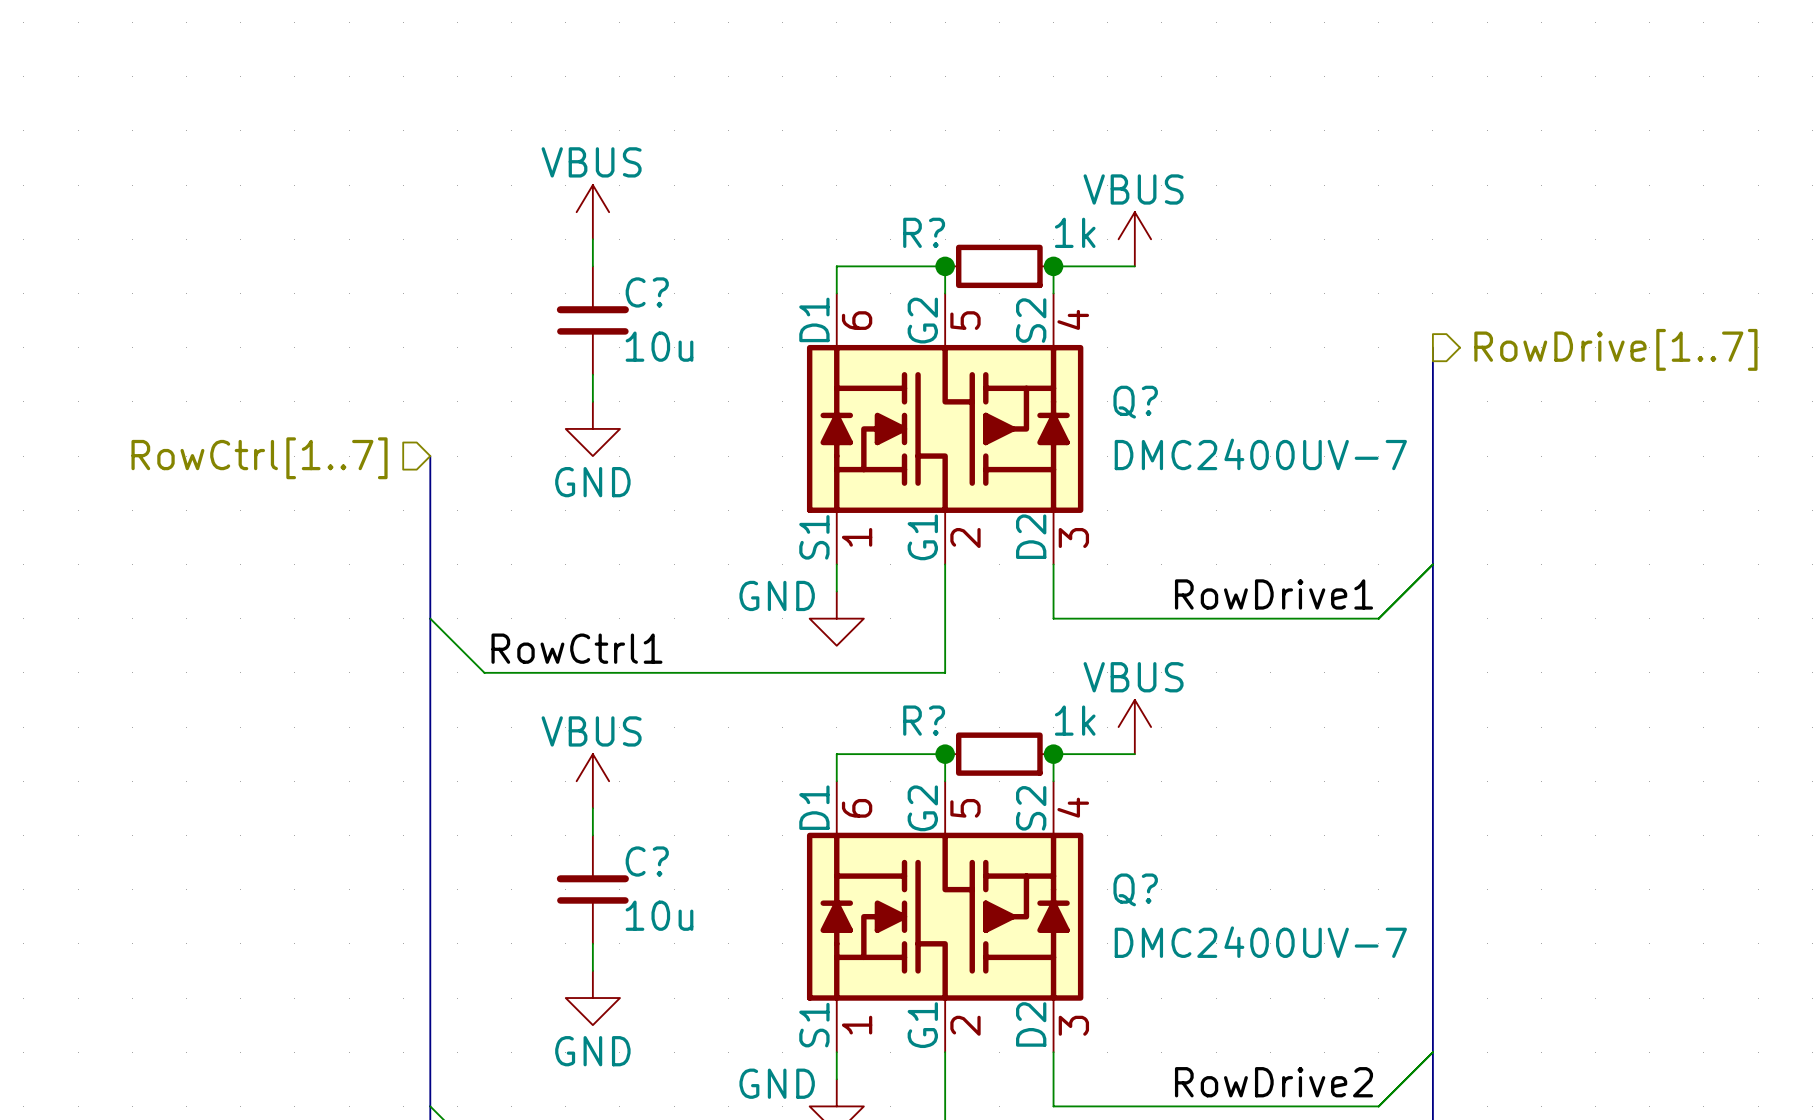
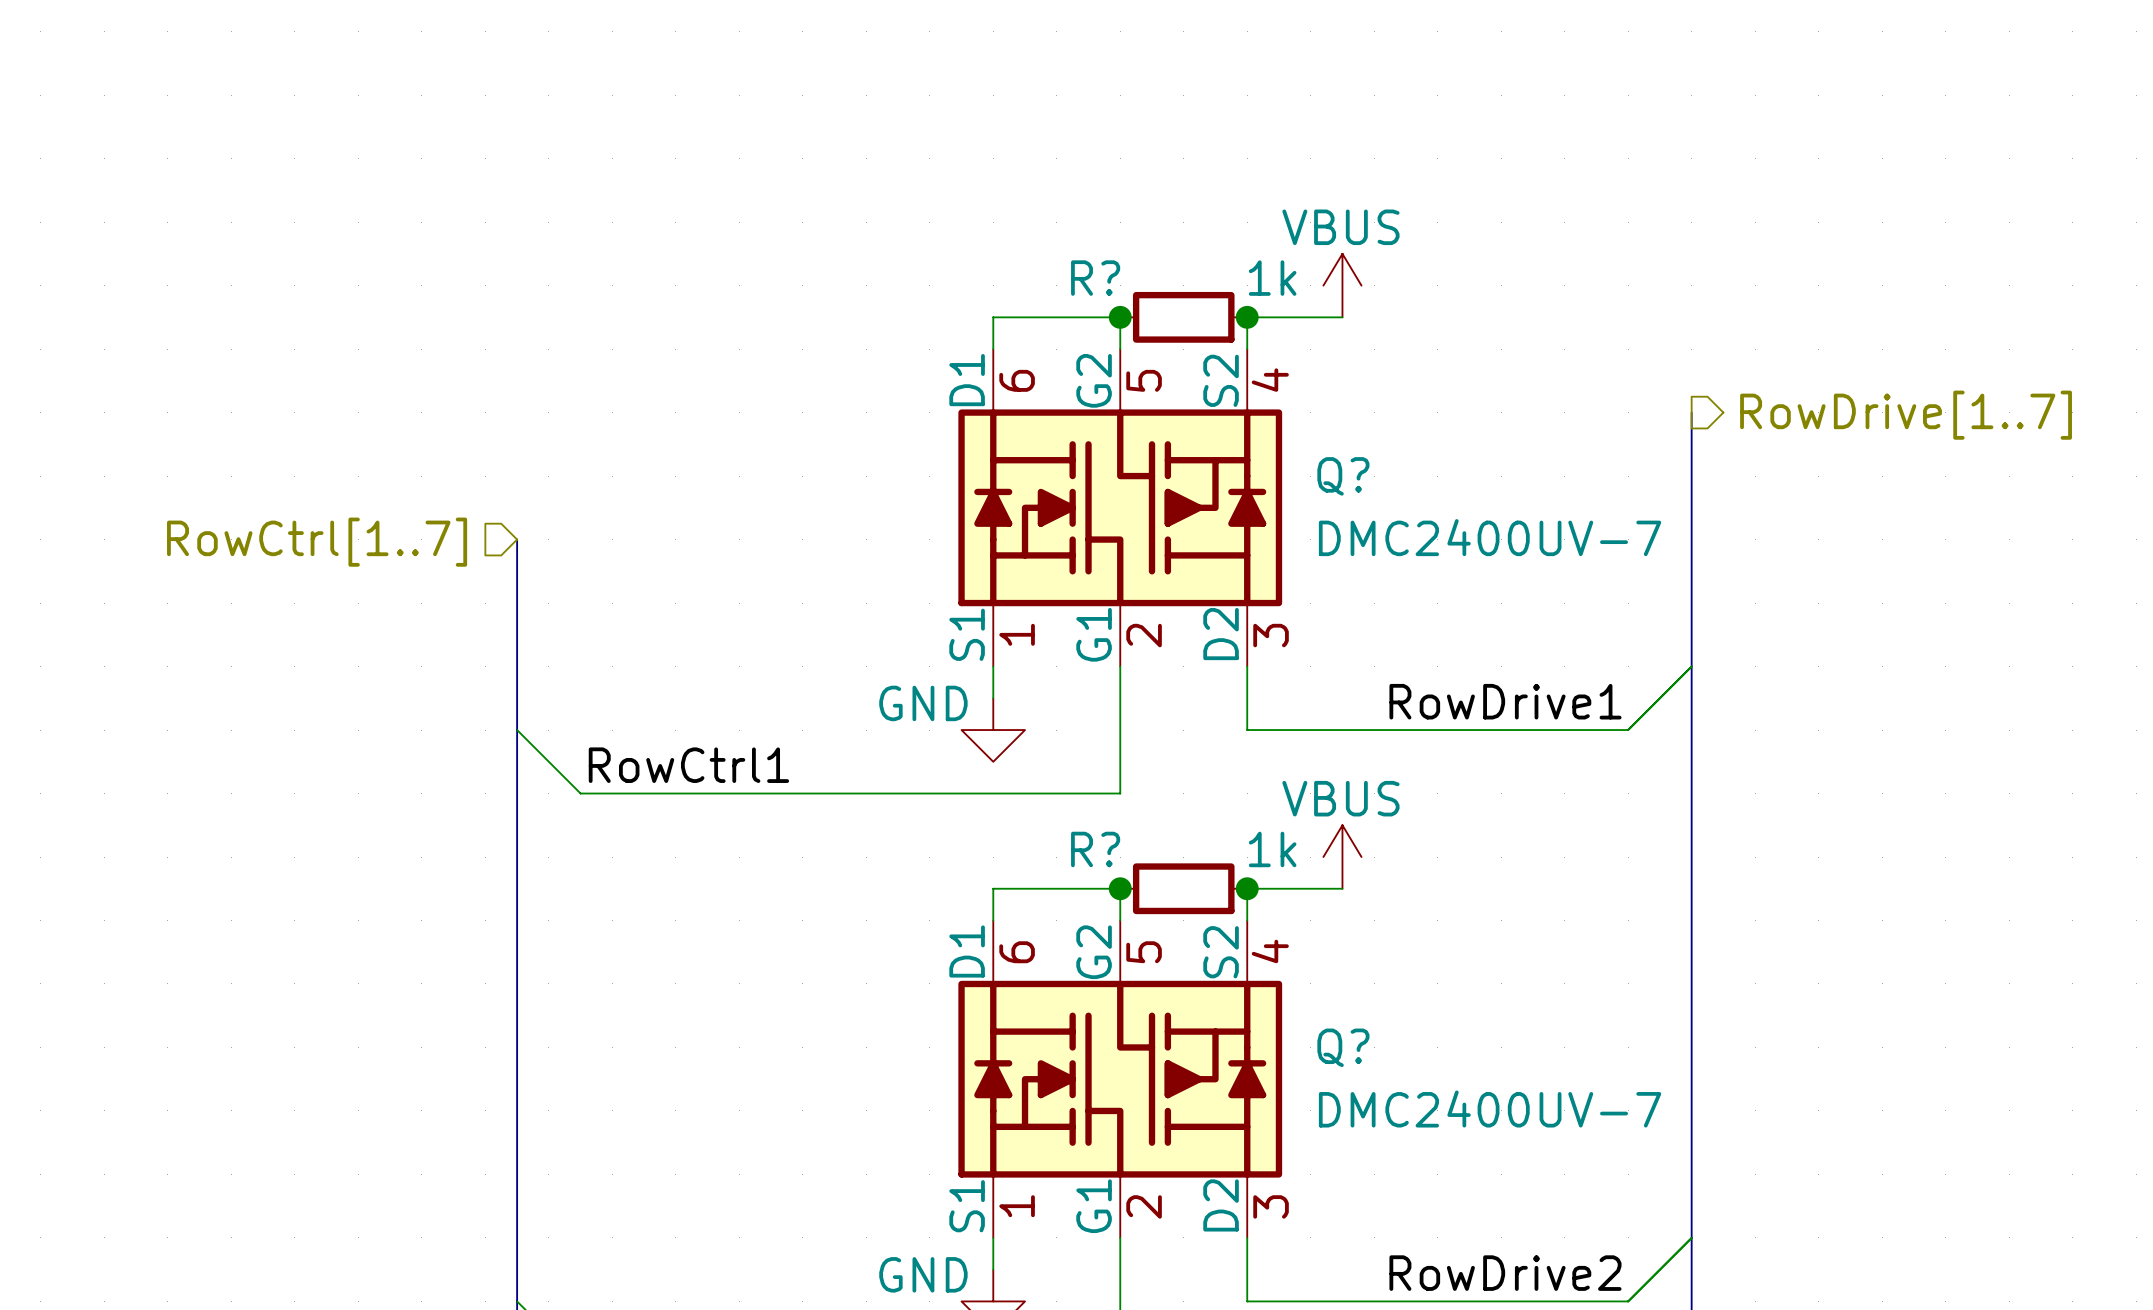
power symbol: VBUS (592, 212) -> none
wire: (592, 239) (592, 266) -> none
C?: (592, 320) -> none
wire: (592, 374) (592, 401) -> none
power symbol: GND (592, 428) -> none
power symbol: VBUS (592, 781) -> none
wire: (592, 808) (592, 835) -> none
C?: (592, 889) -> none
wire: (592, 943) (592, 970) -> none
power symbol: GND (592, 998) -> none

